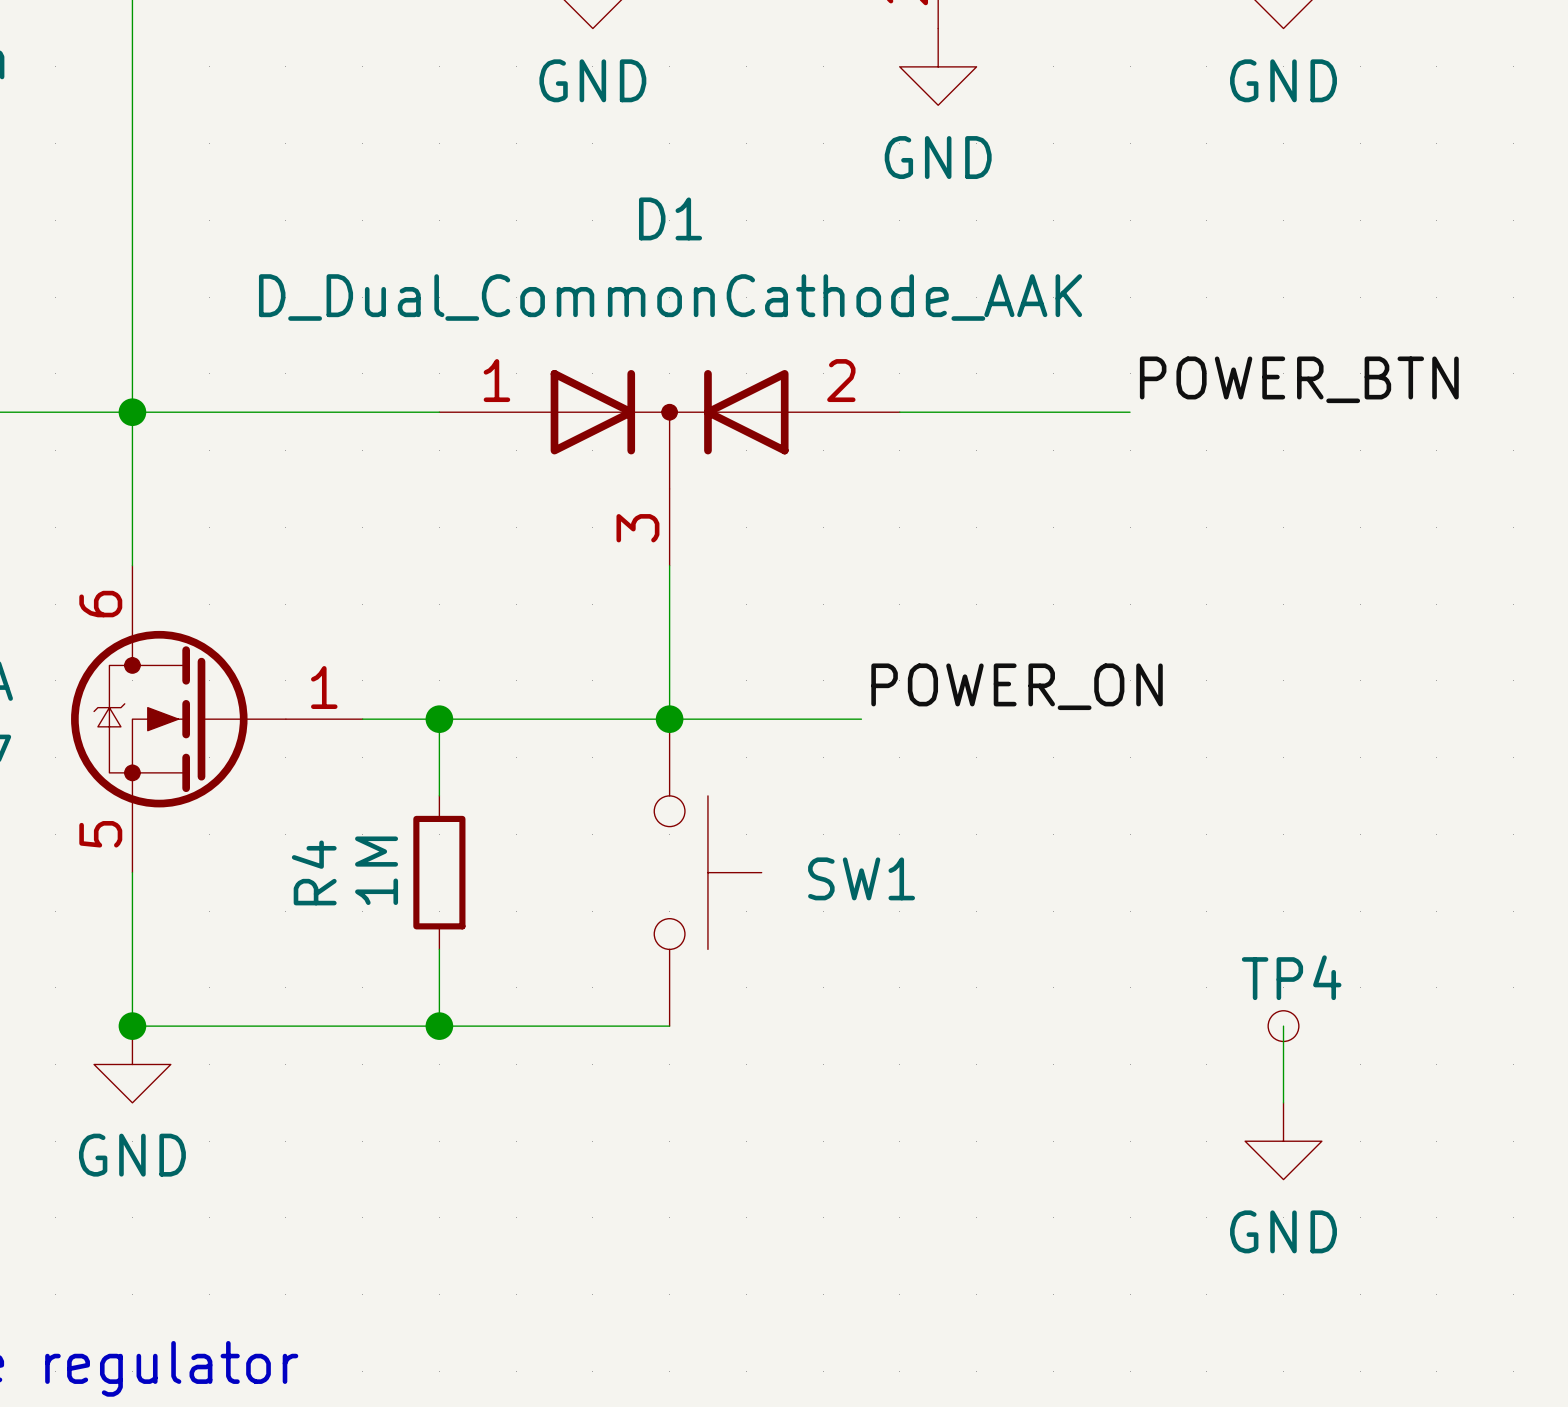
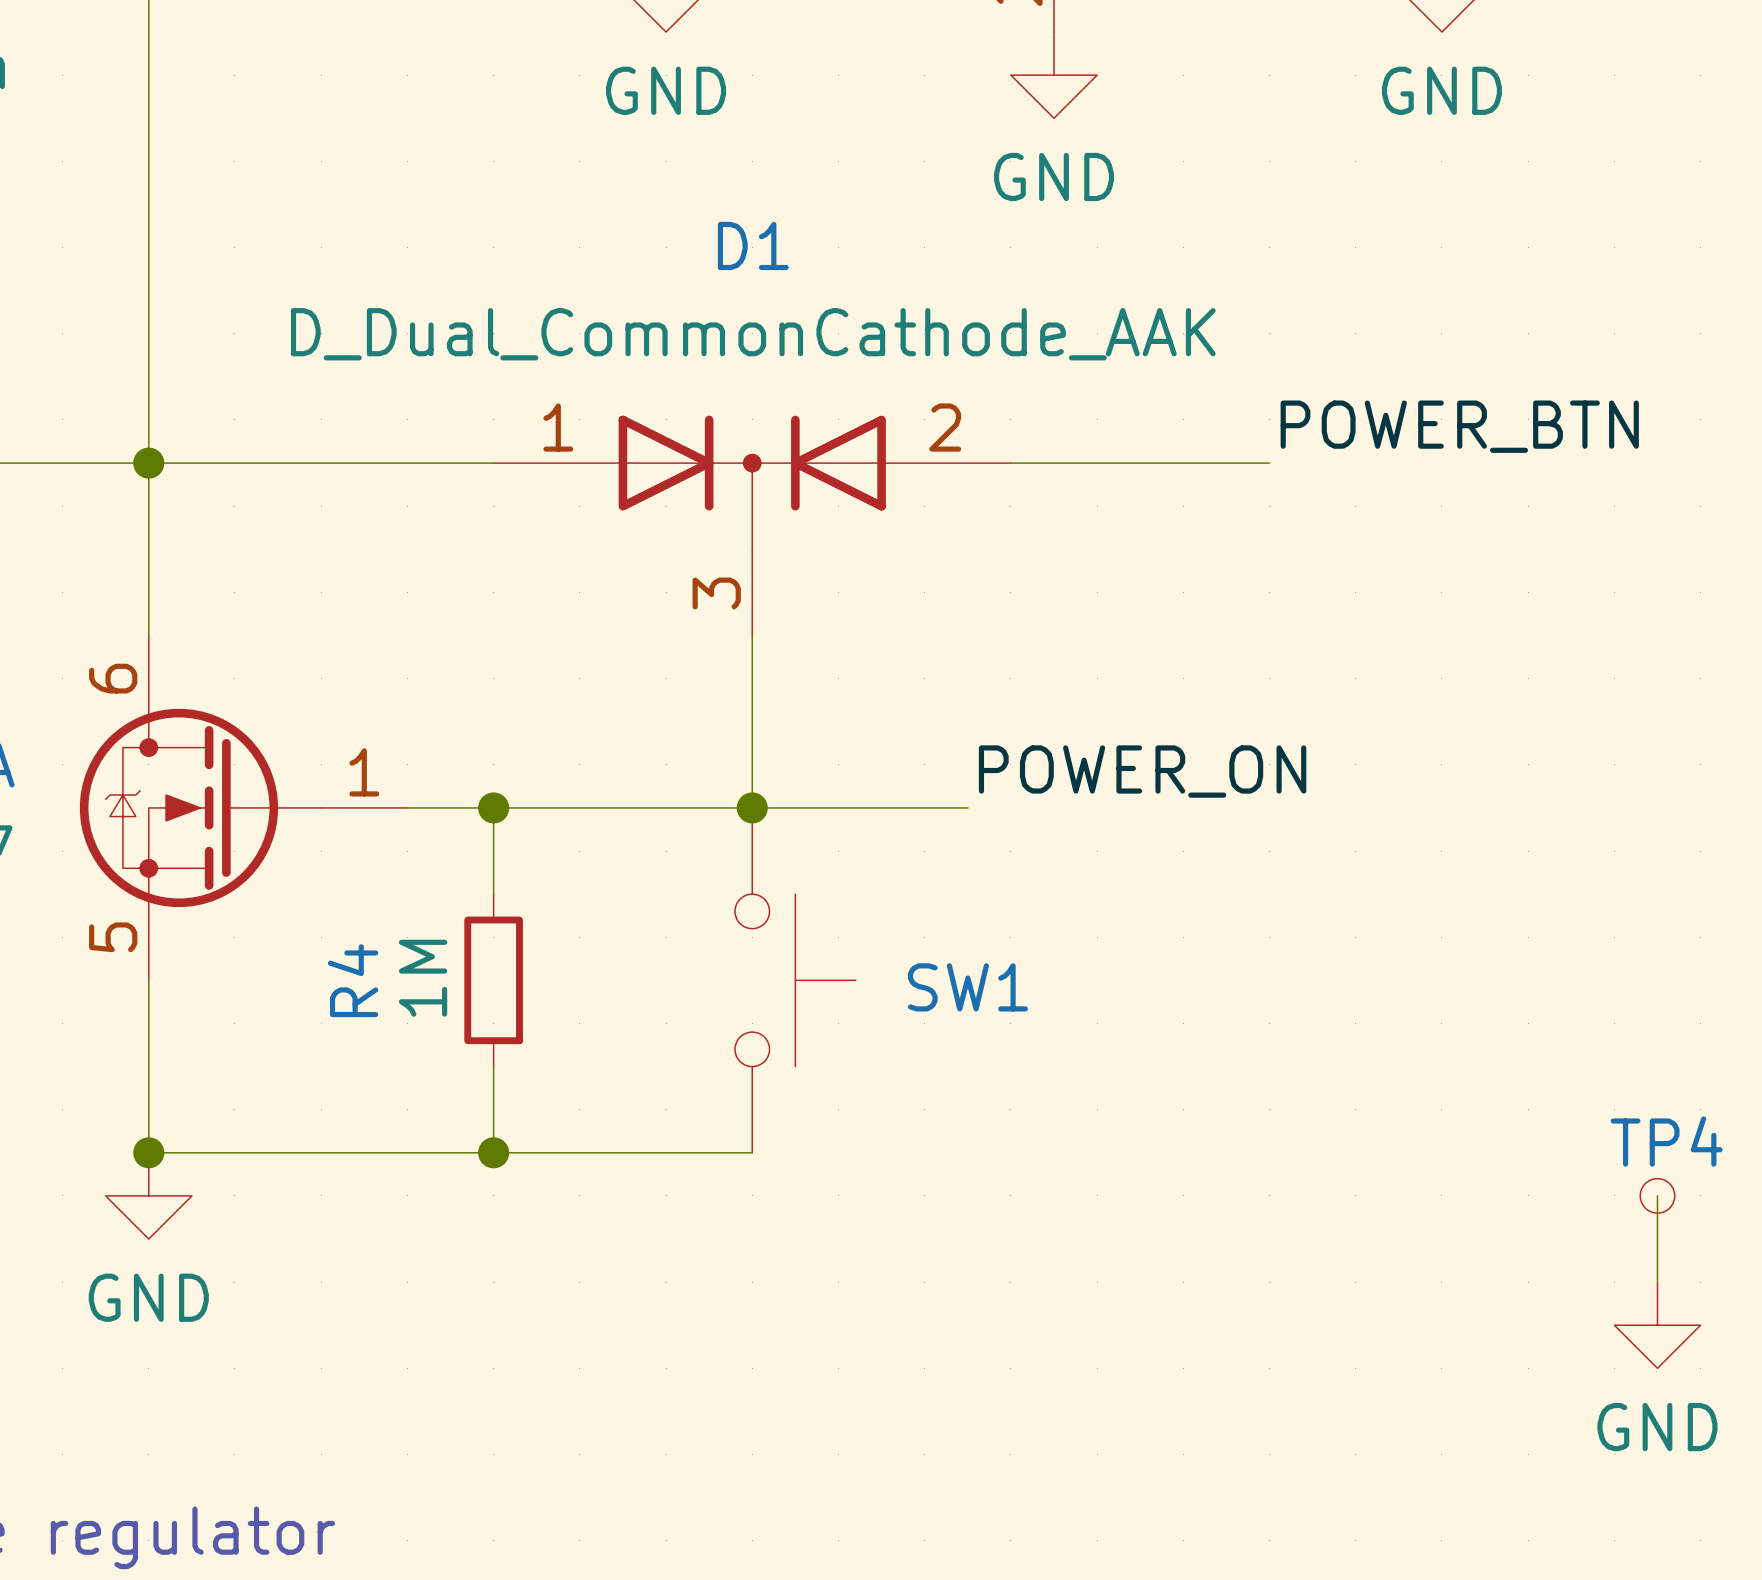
wire: (1283, 1026) (1283, 1102) -> (1657, 1195) (1657, 1282)
TP4 position: (1283, 1026) -> (1657, 1195)
power symbol position: GND (1283, 1141) -> GND (1657, 1325)

